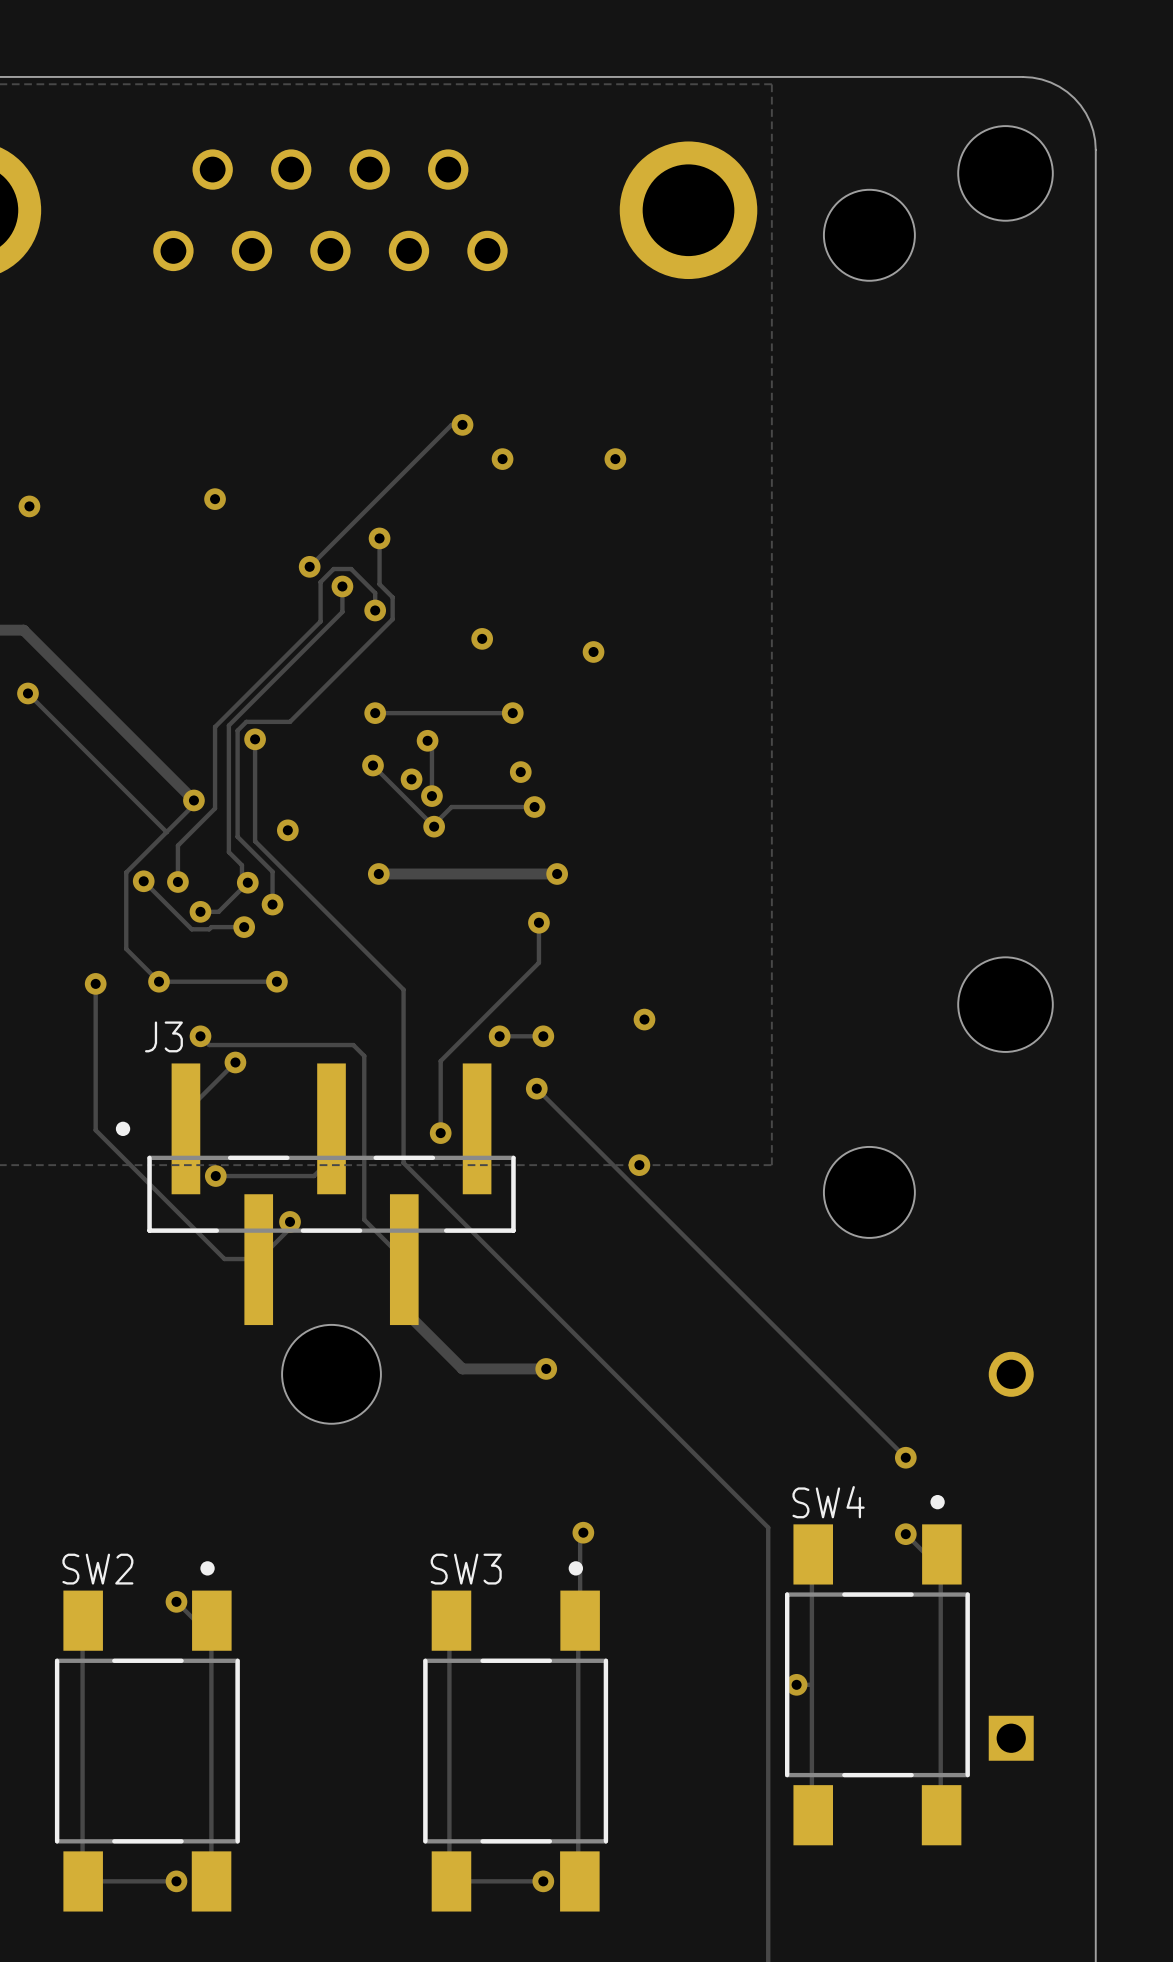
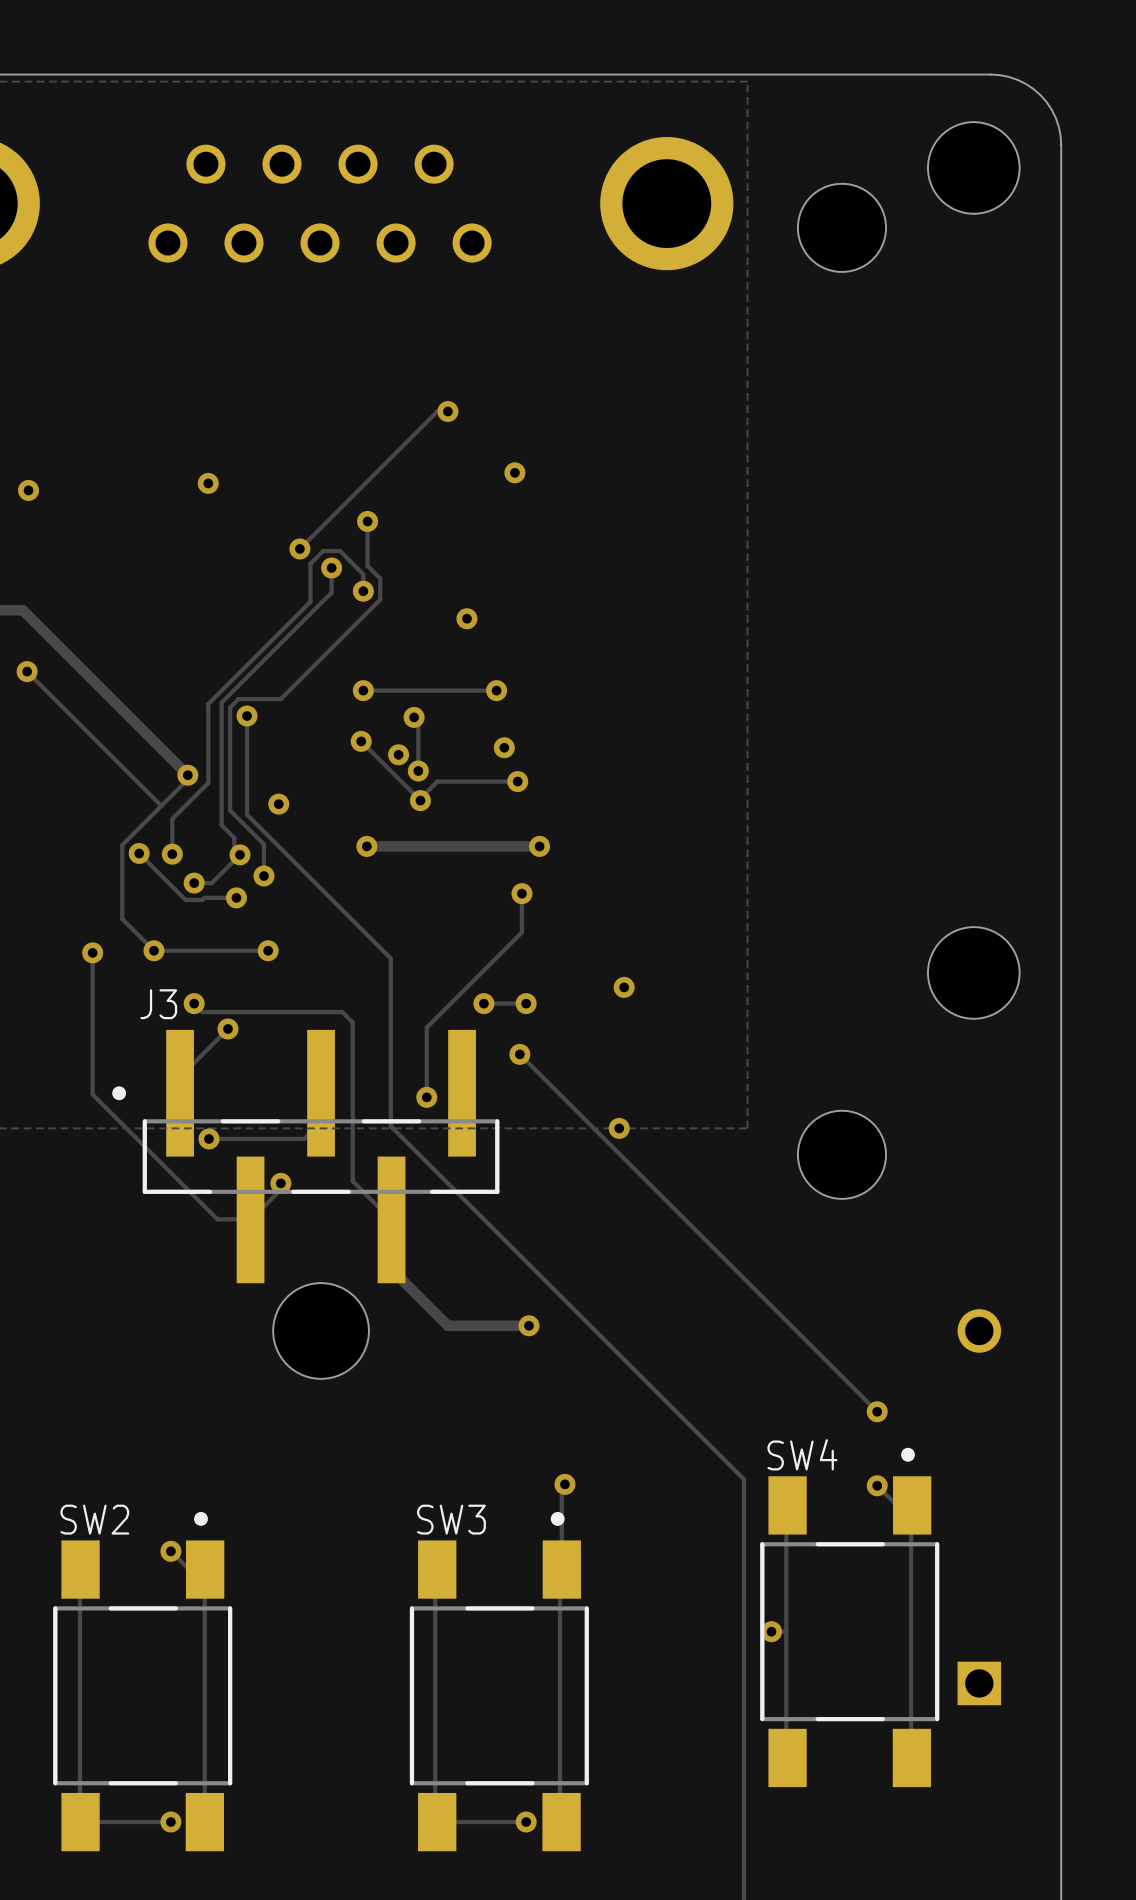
via position: (502, 459) -> (514, 472)
via: (615, 459) -> none
via: (593, 651) -> none

